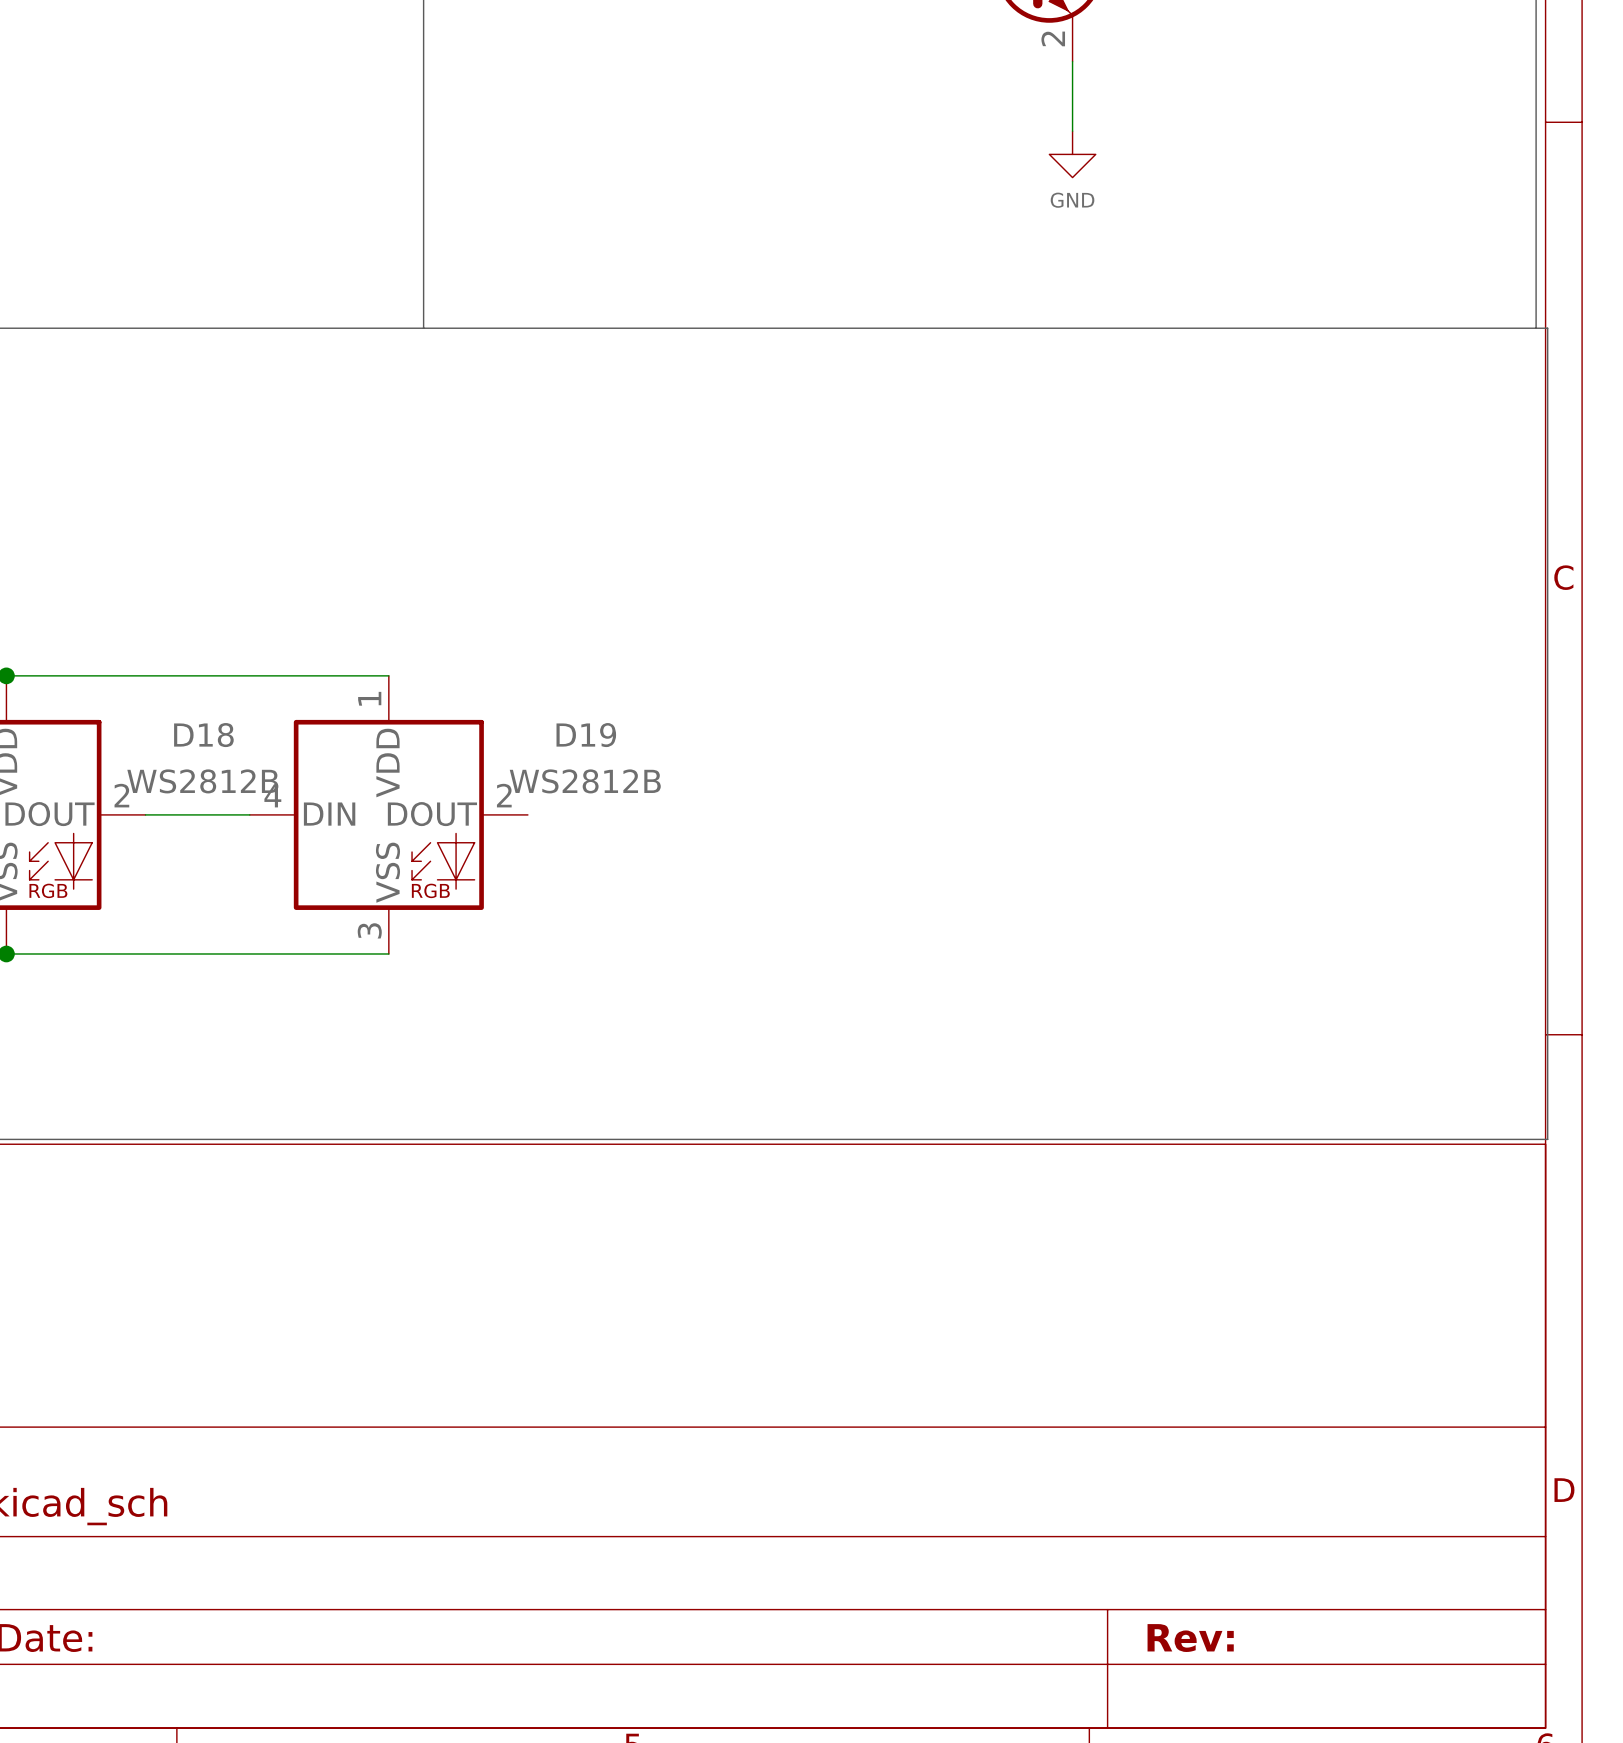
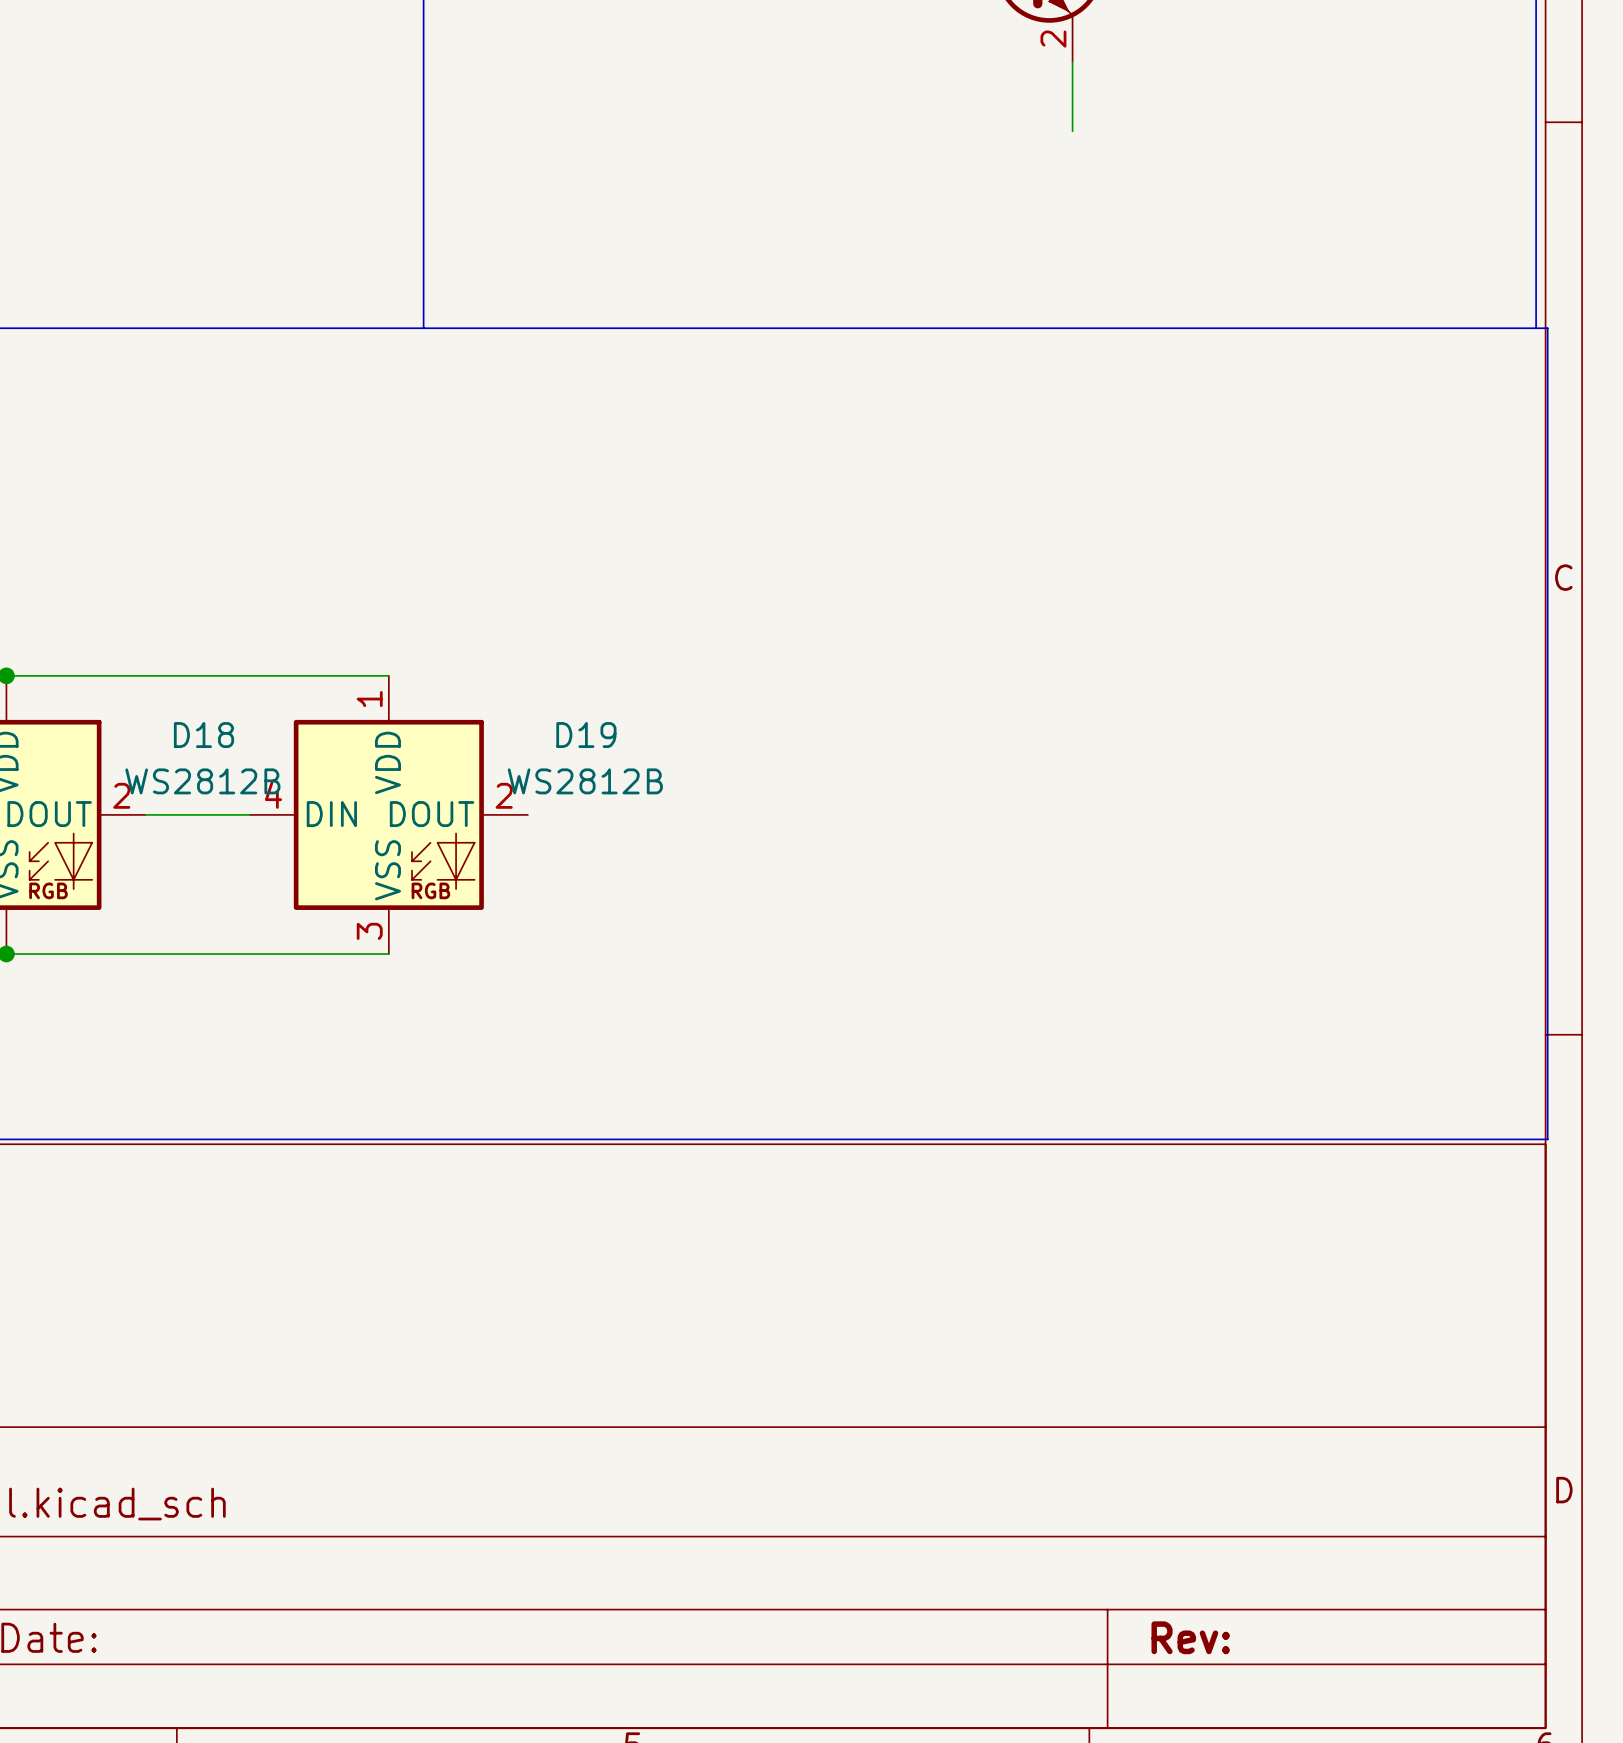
power symbol: GND (1072, 154) -> none

